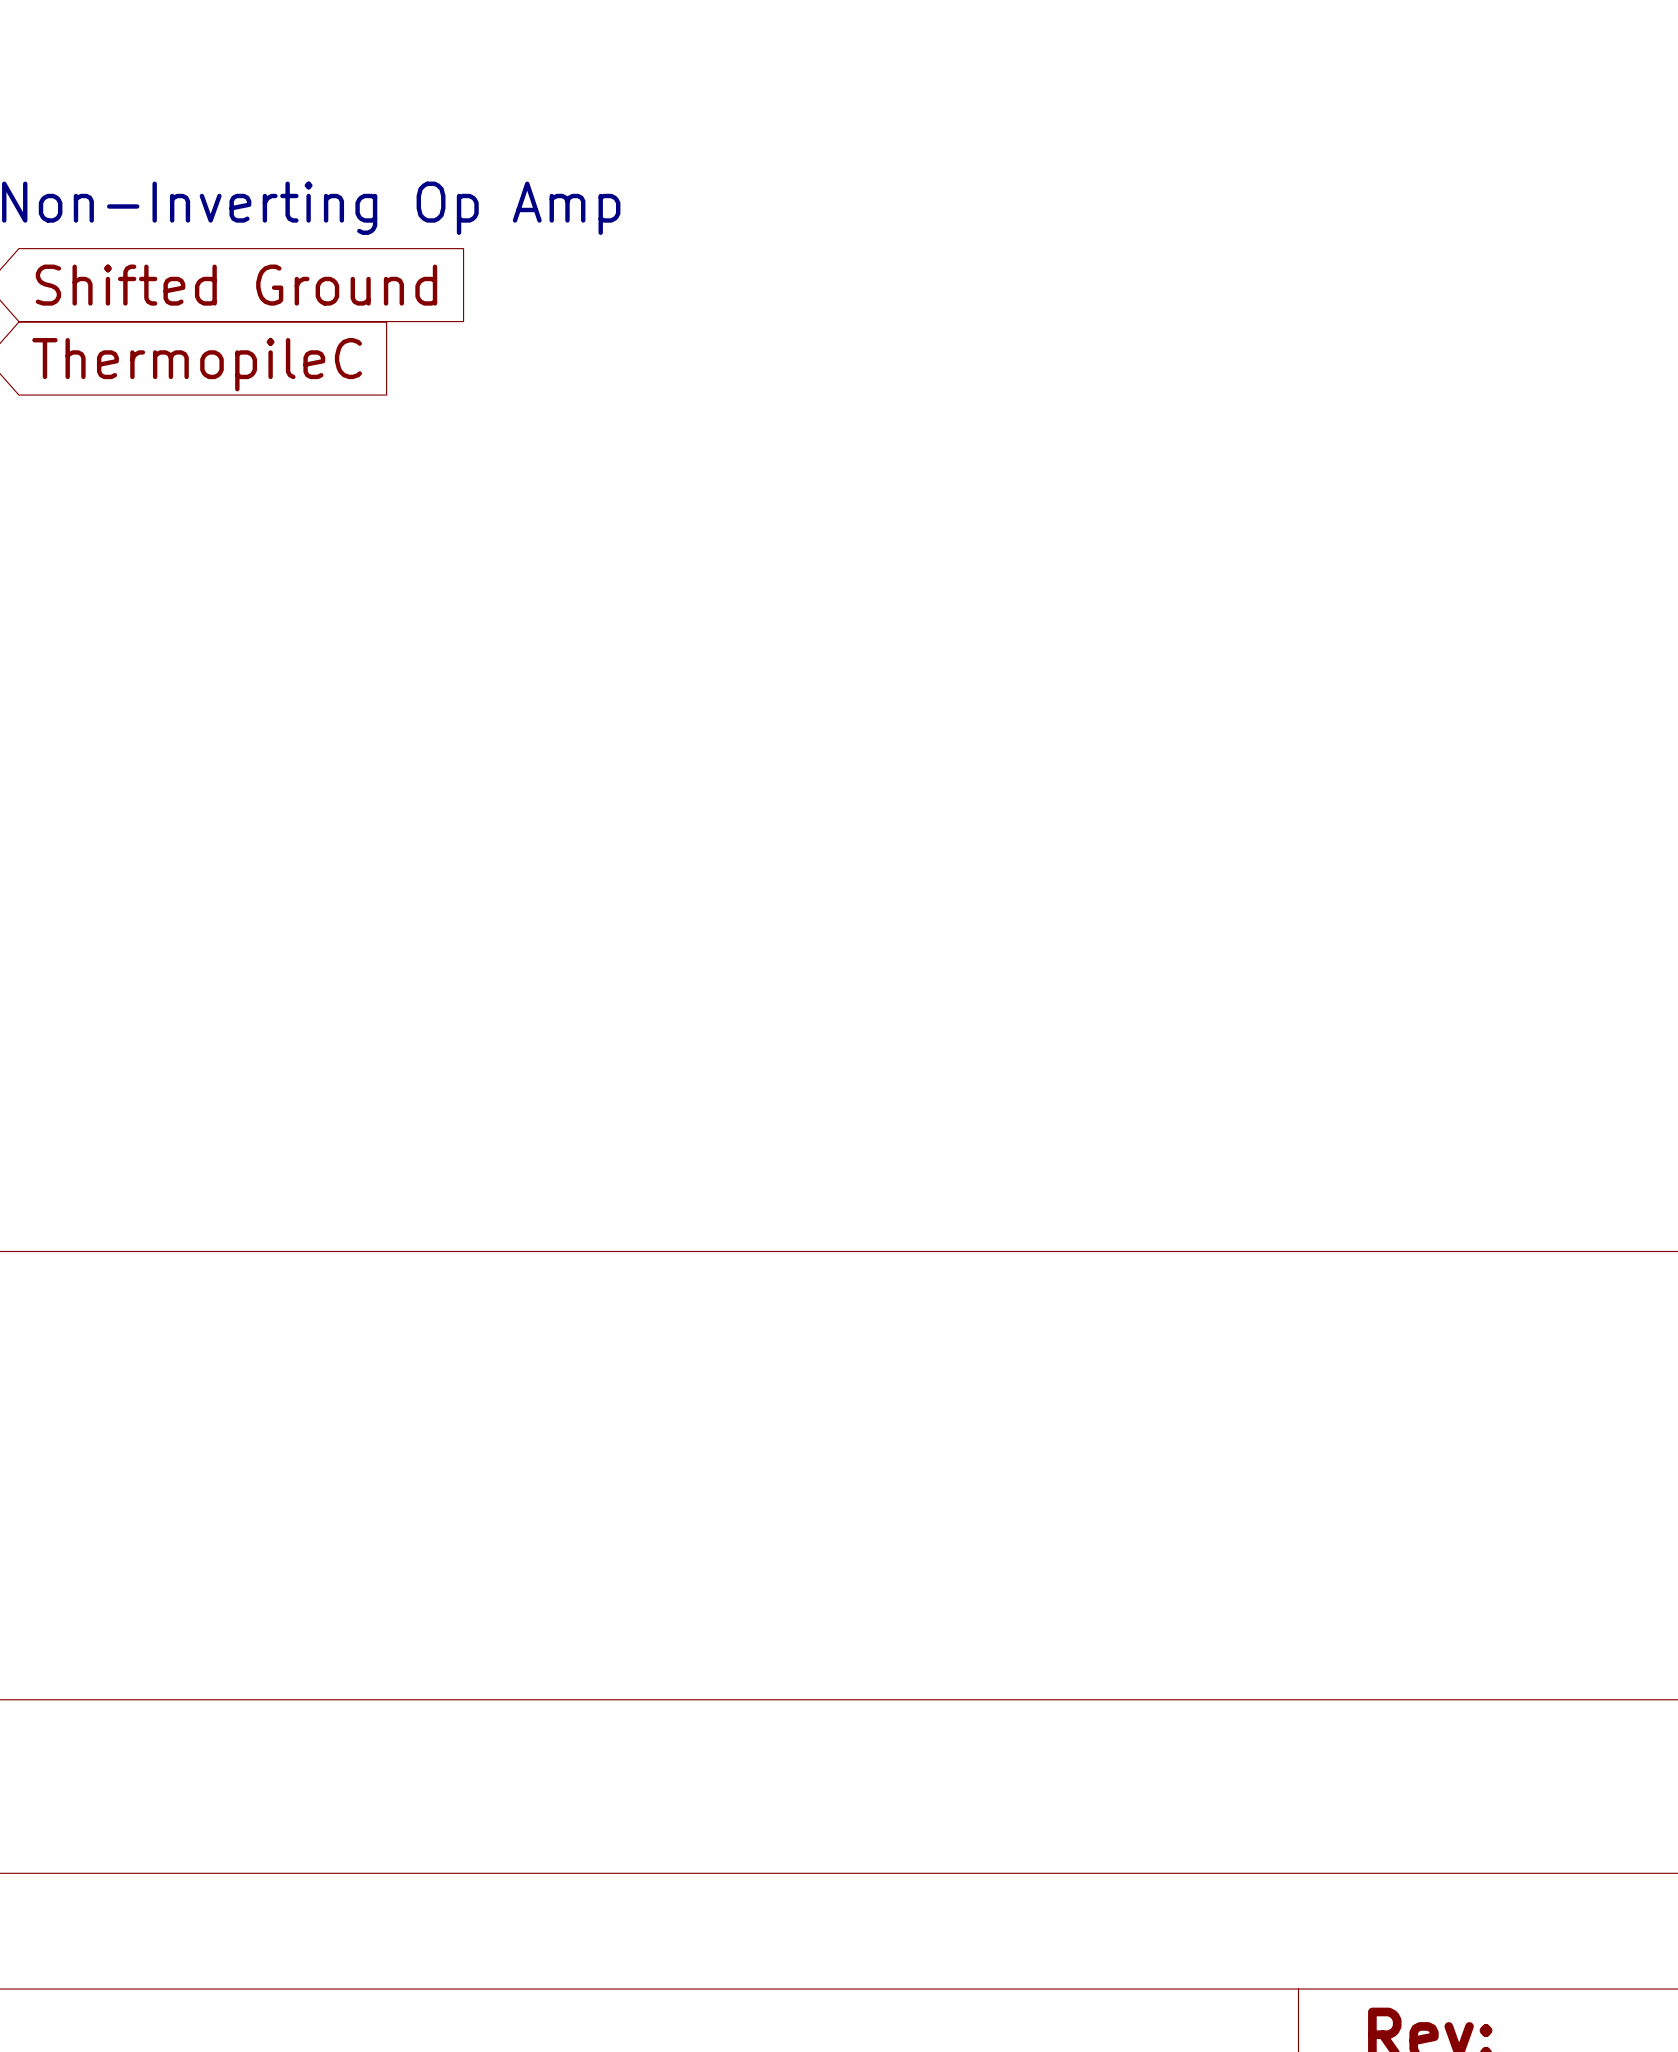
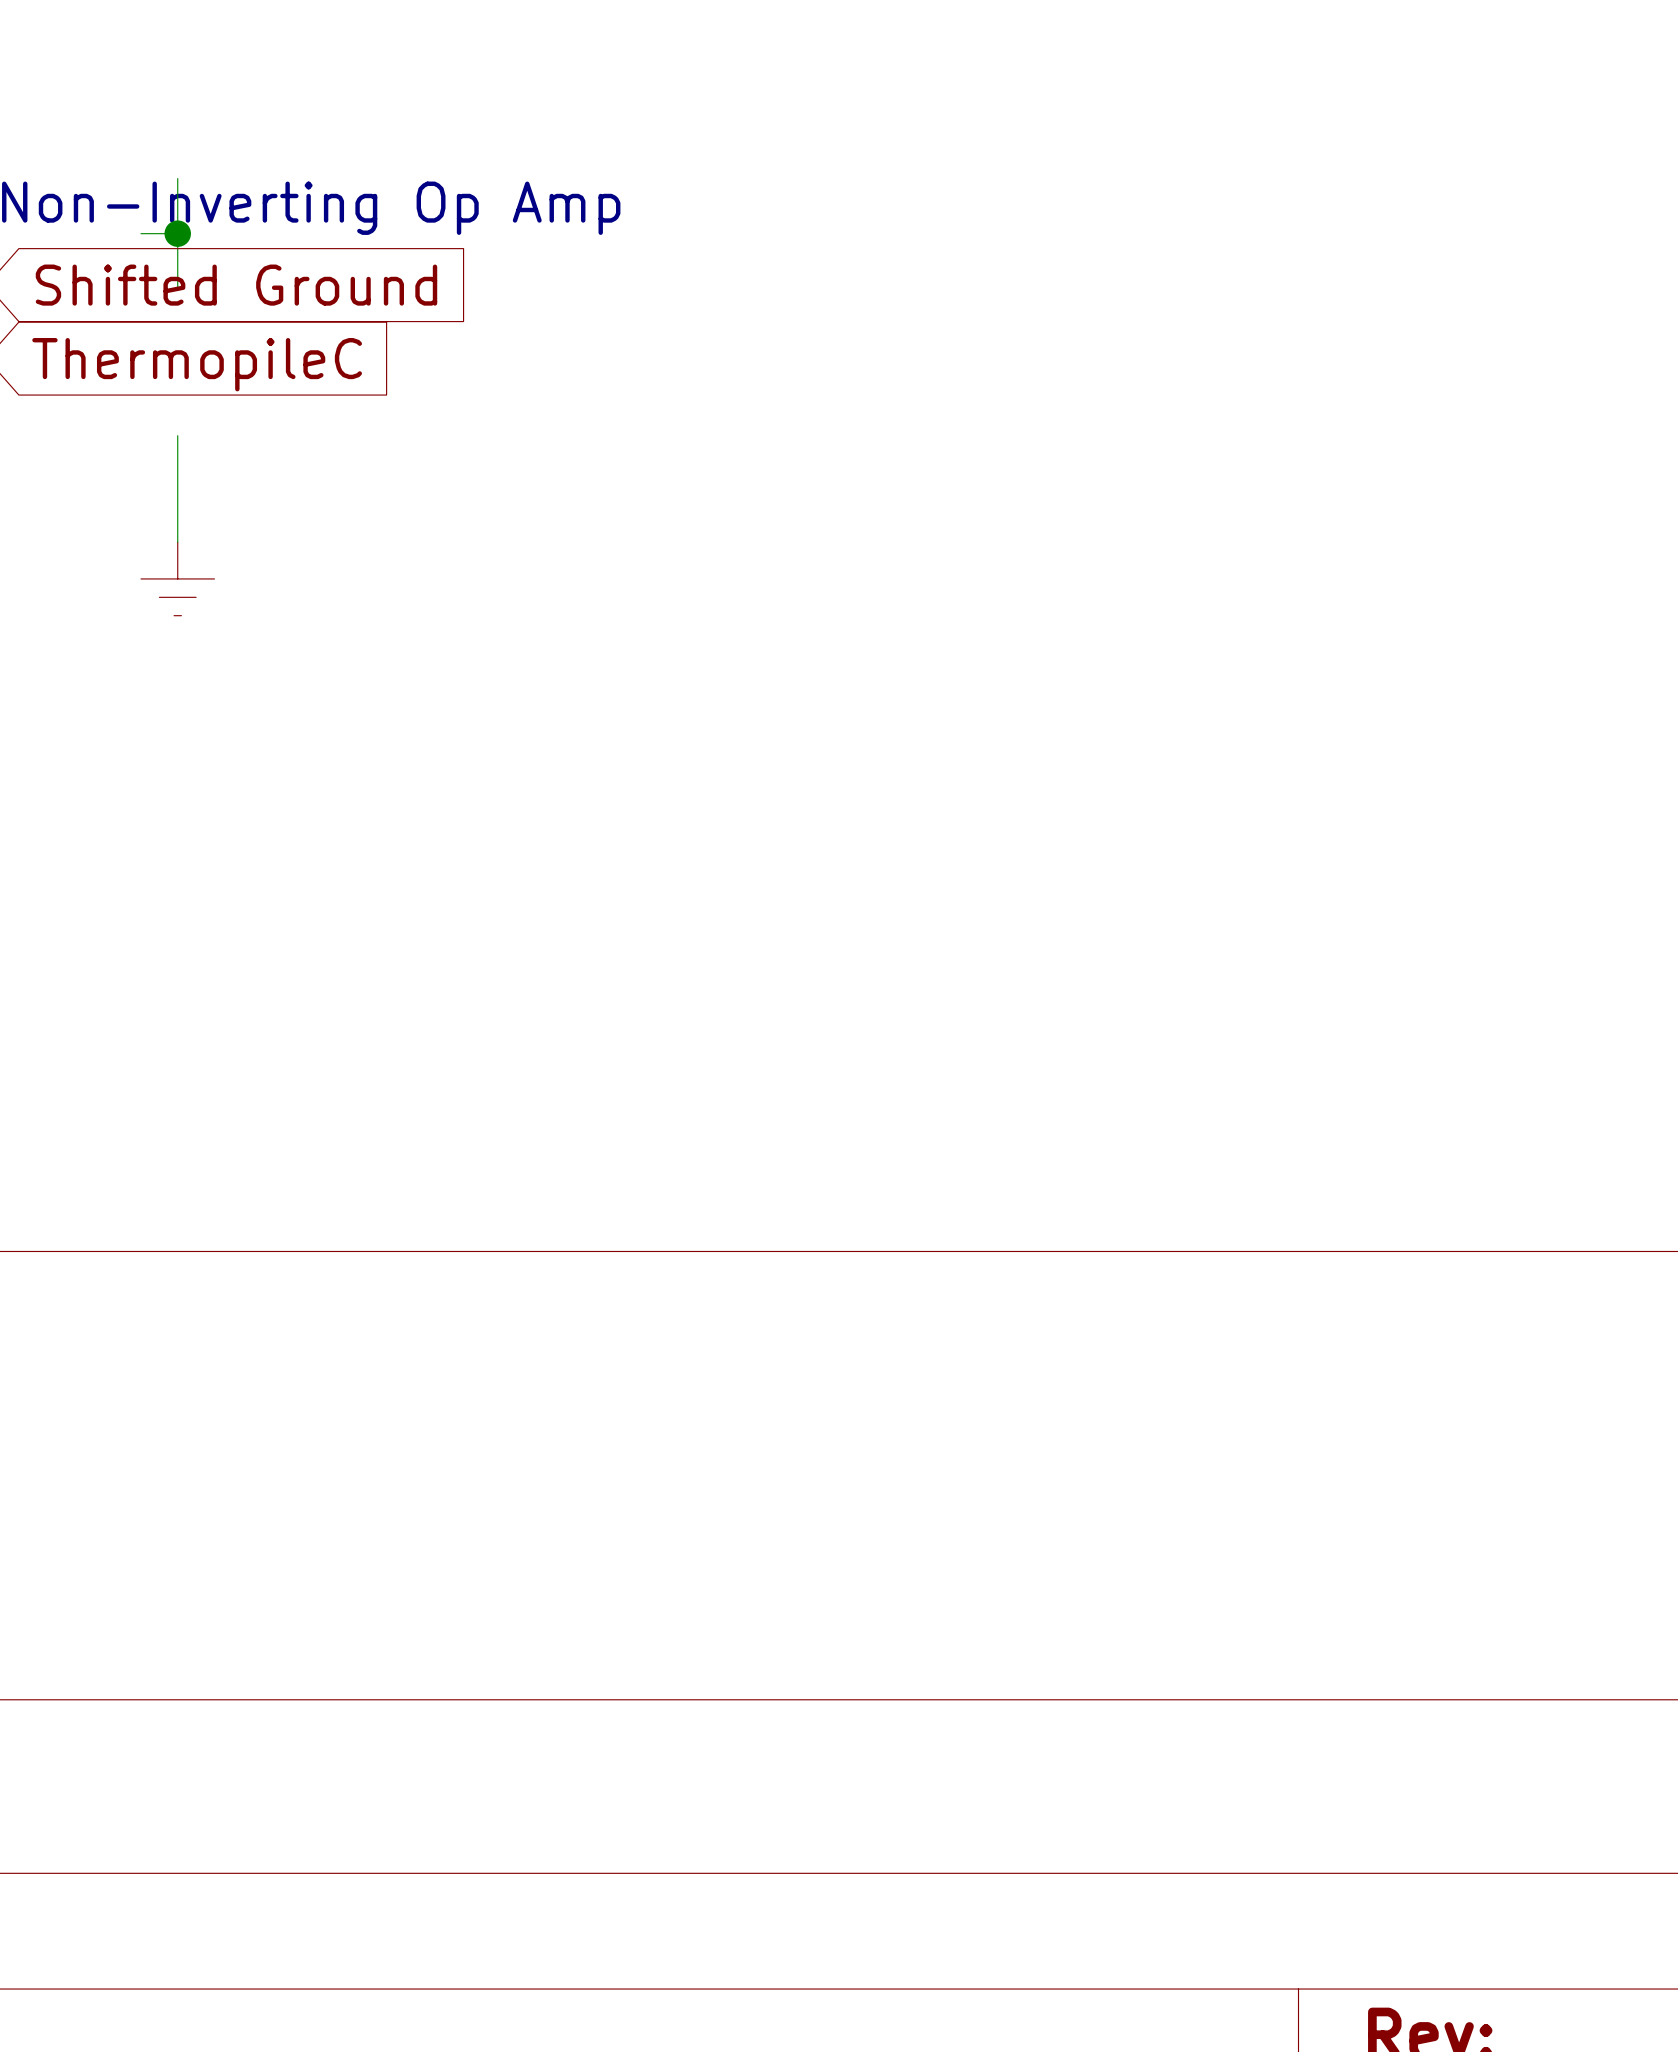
wire: none -> (177, 178) (177, 288)
wire: none -> (141, 233) (177, 233)
junction: none -> (177, 233)
wire: none -> (177, 435) (177, 542)
power symbol: none -> (177, 578)

